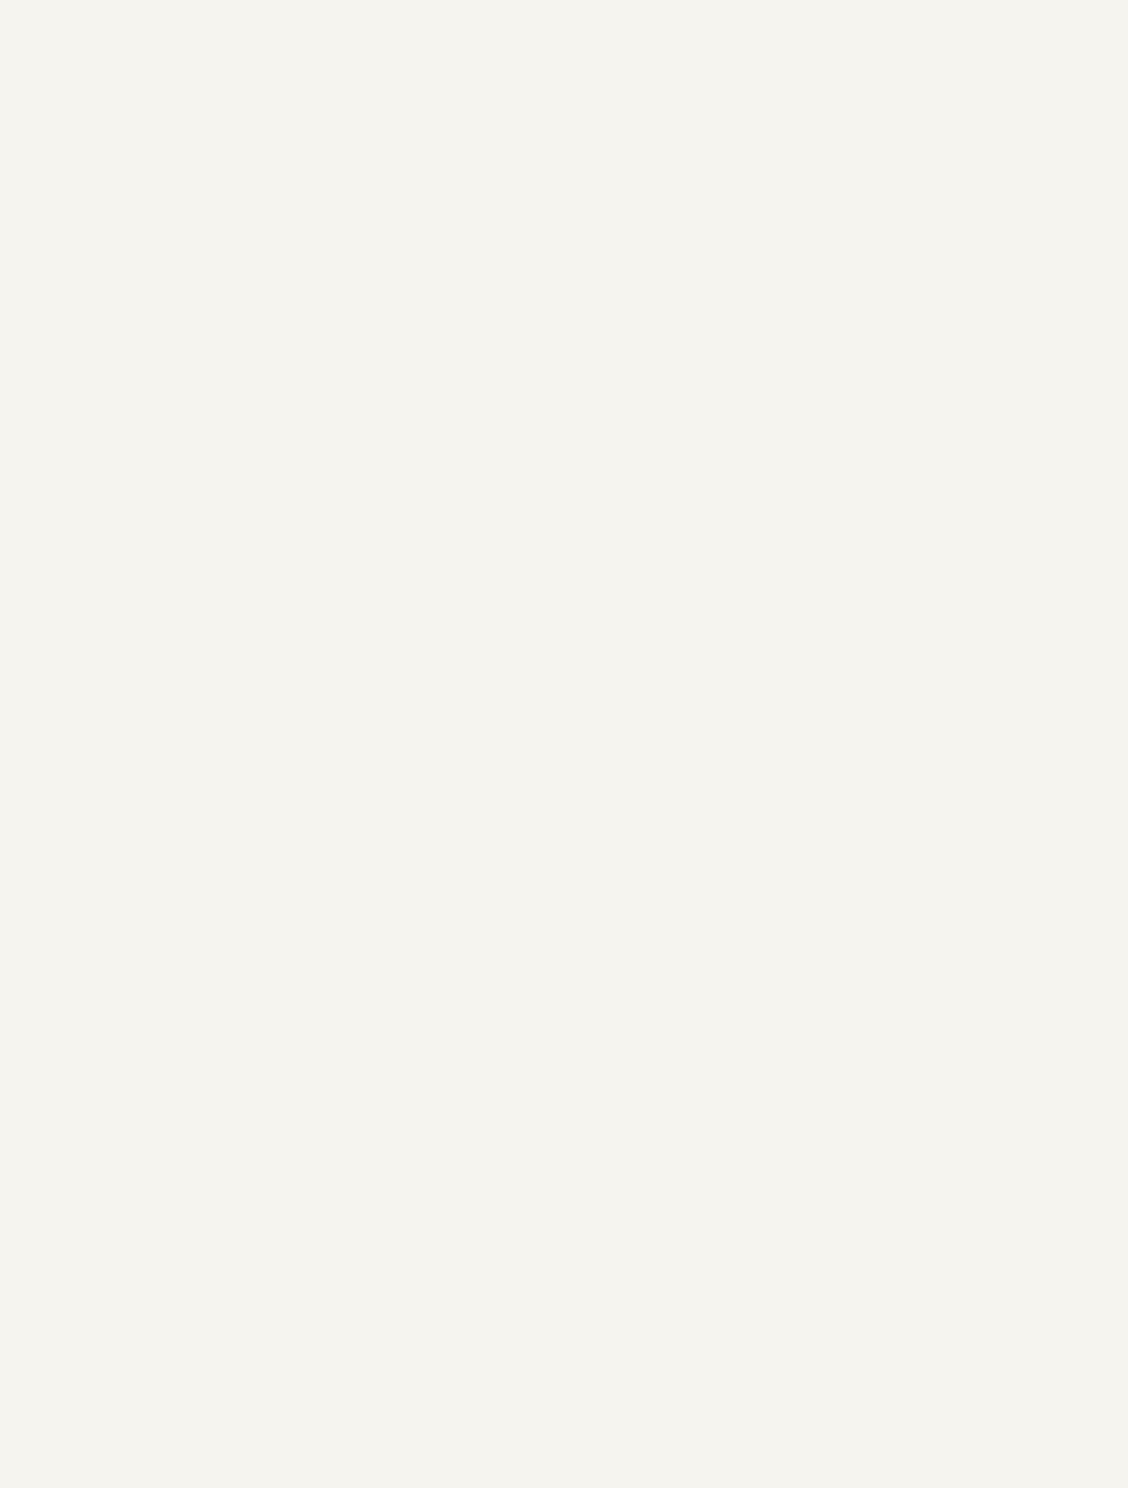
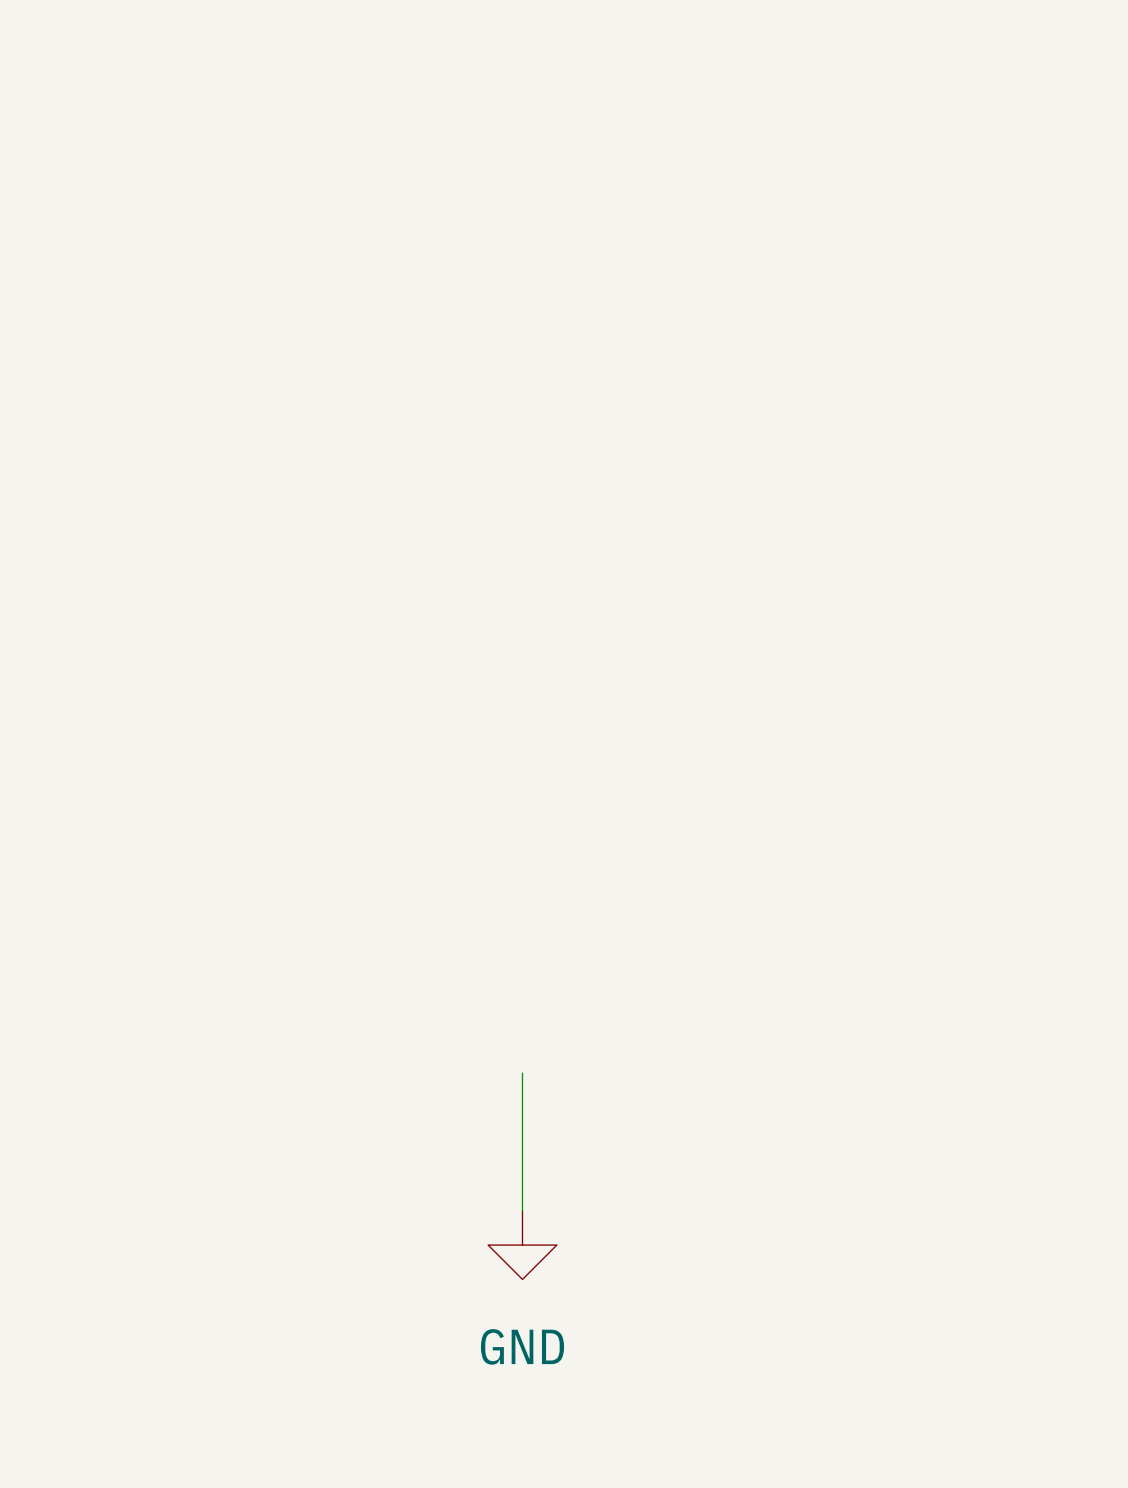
wire: none -> (522, 1073) (522, 1210)
power symbol: none -> GND (522, 1245)

